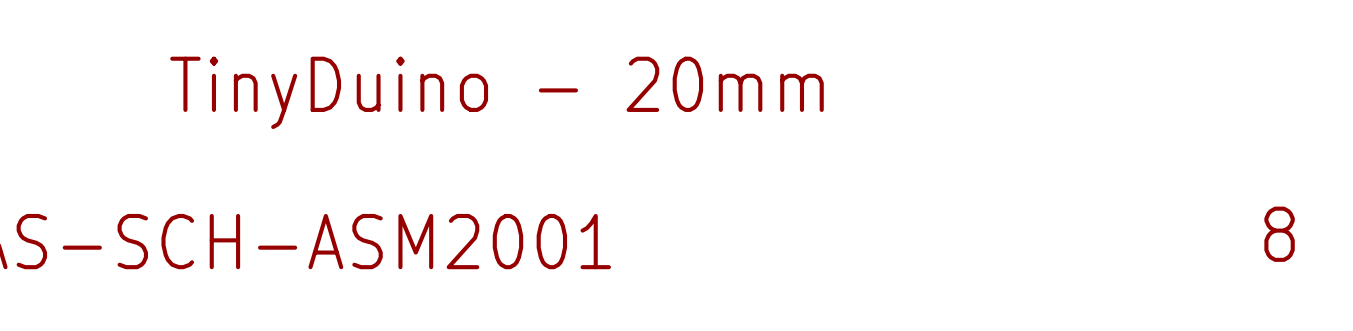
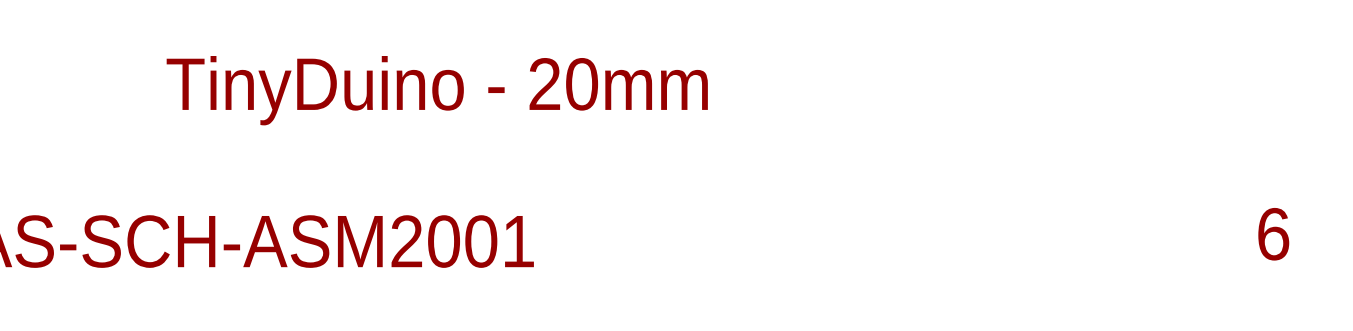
text: 8 (1279, 234) -> 6 (1273, 234)

